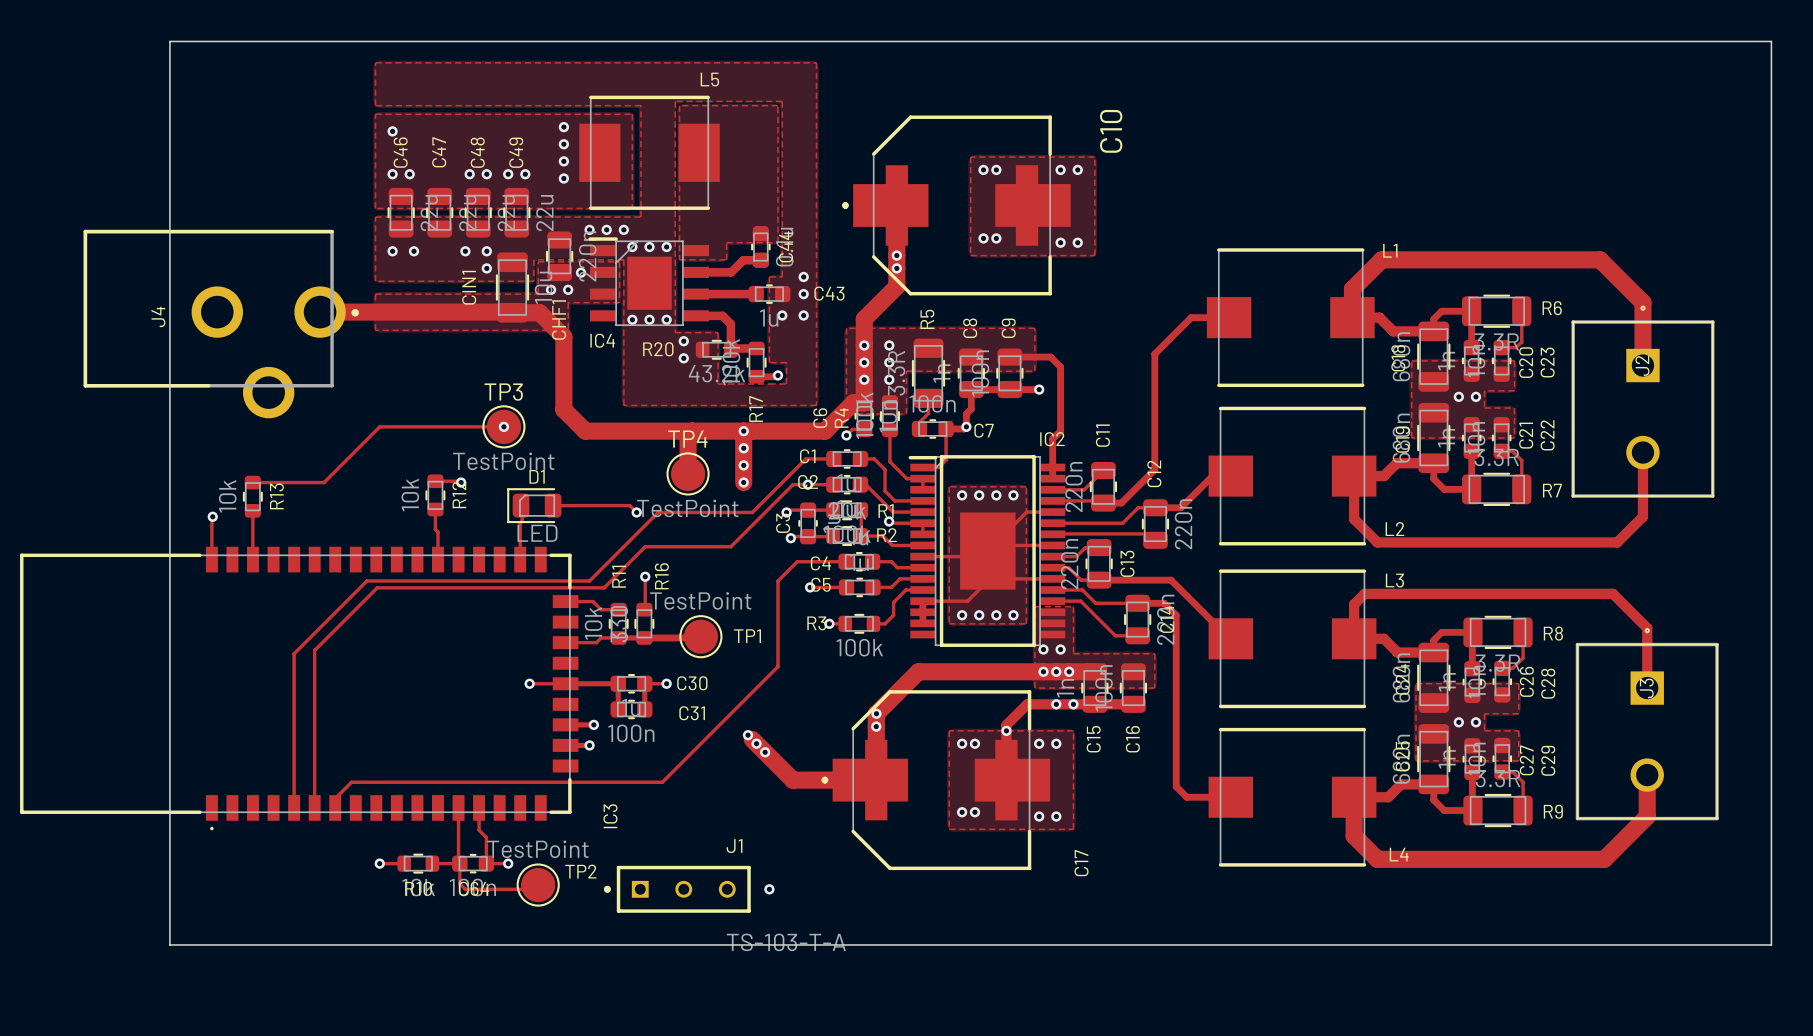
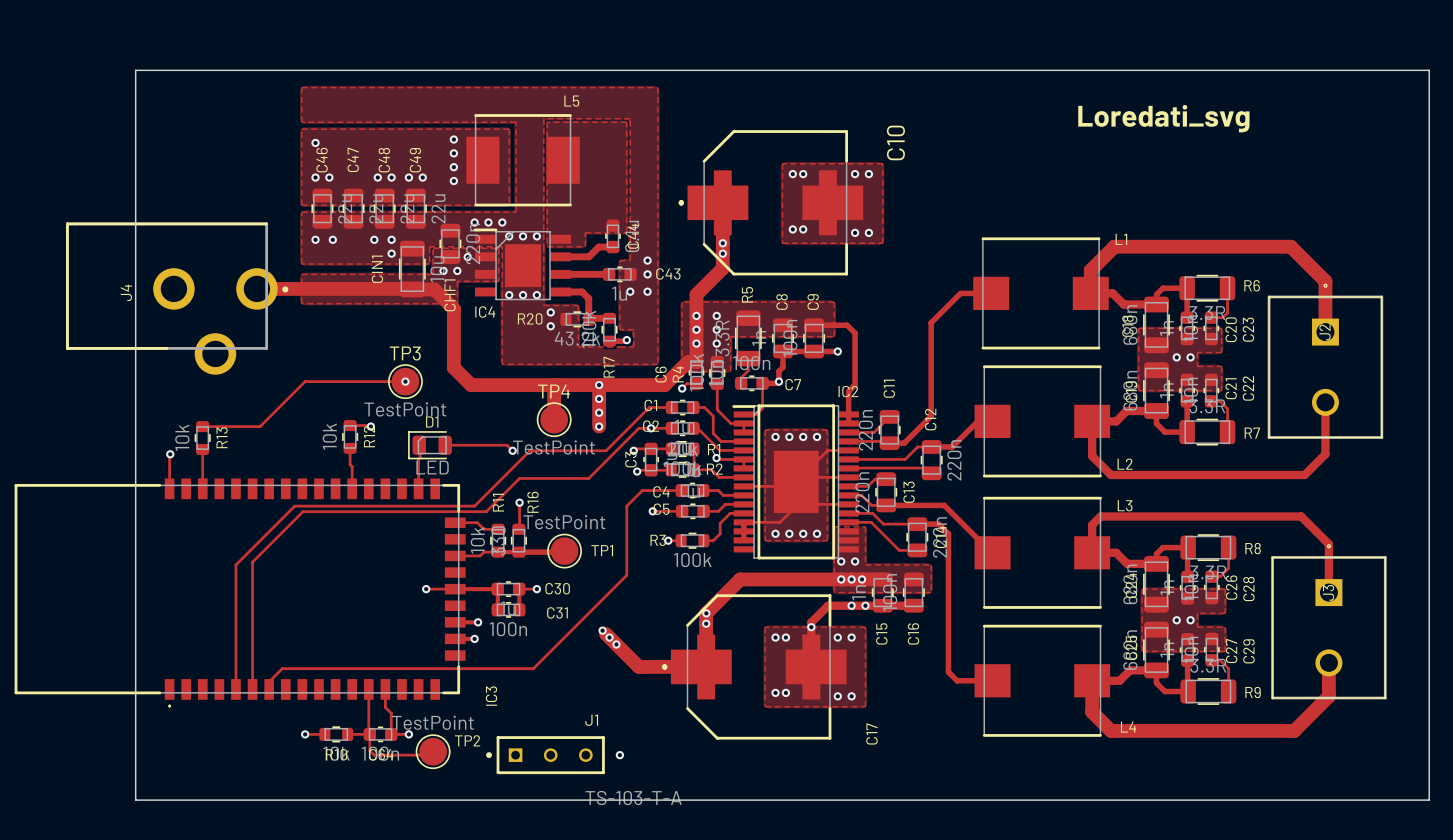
text: none -> Loredati_svg (1163, 118)

